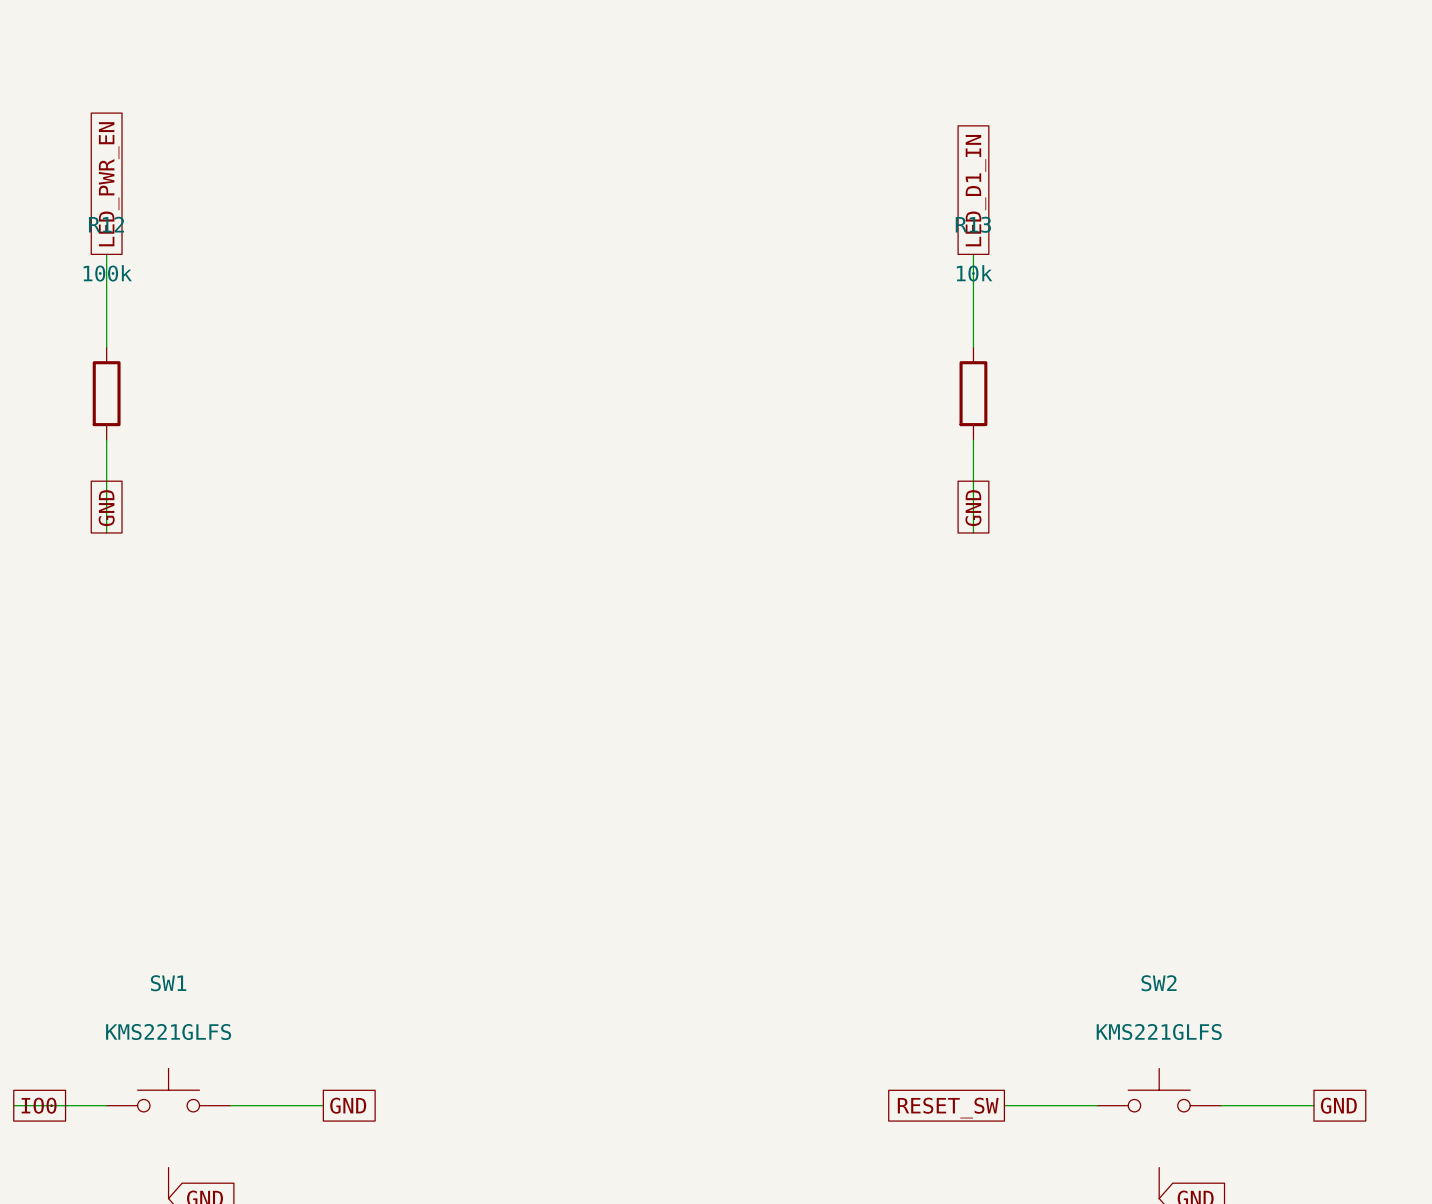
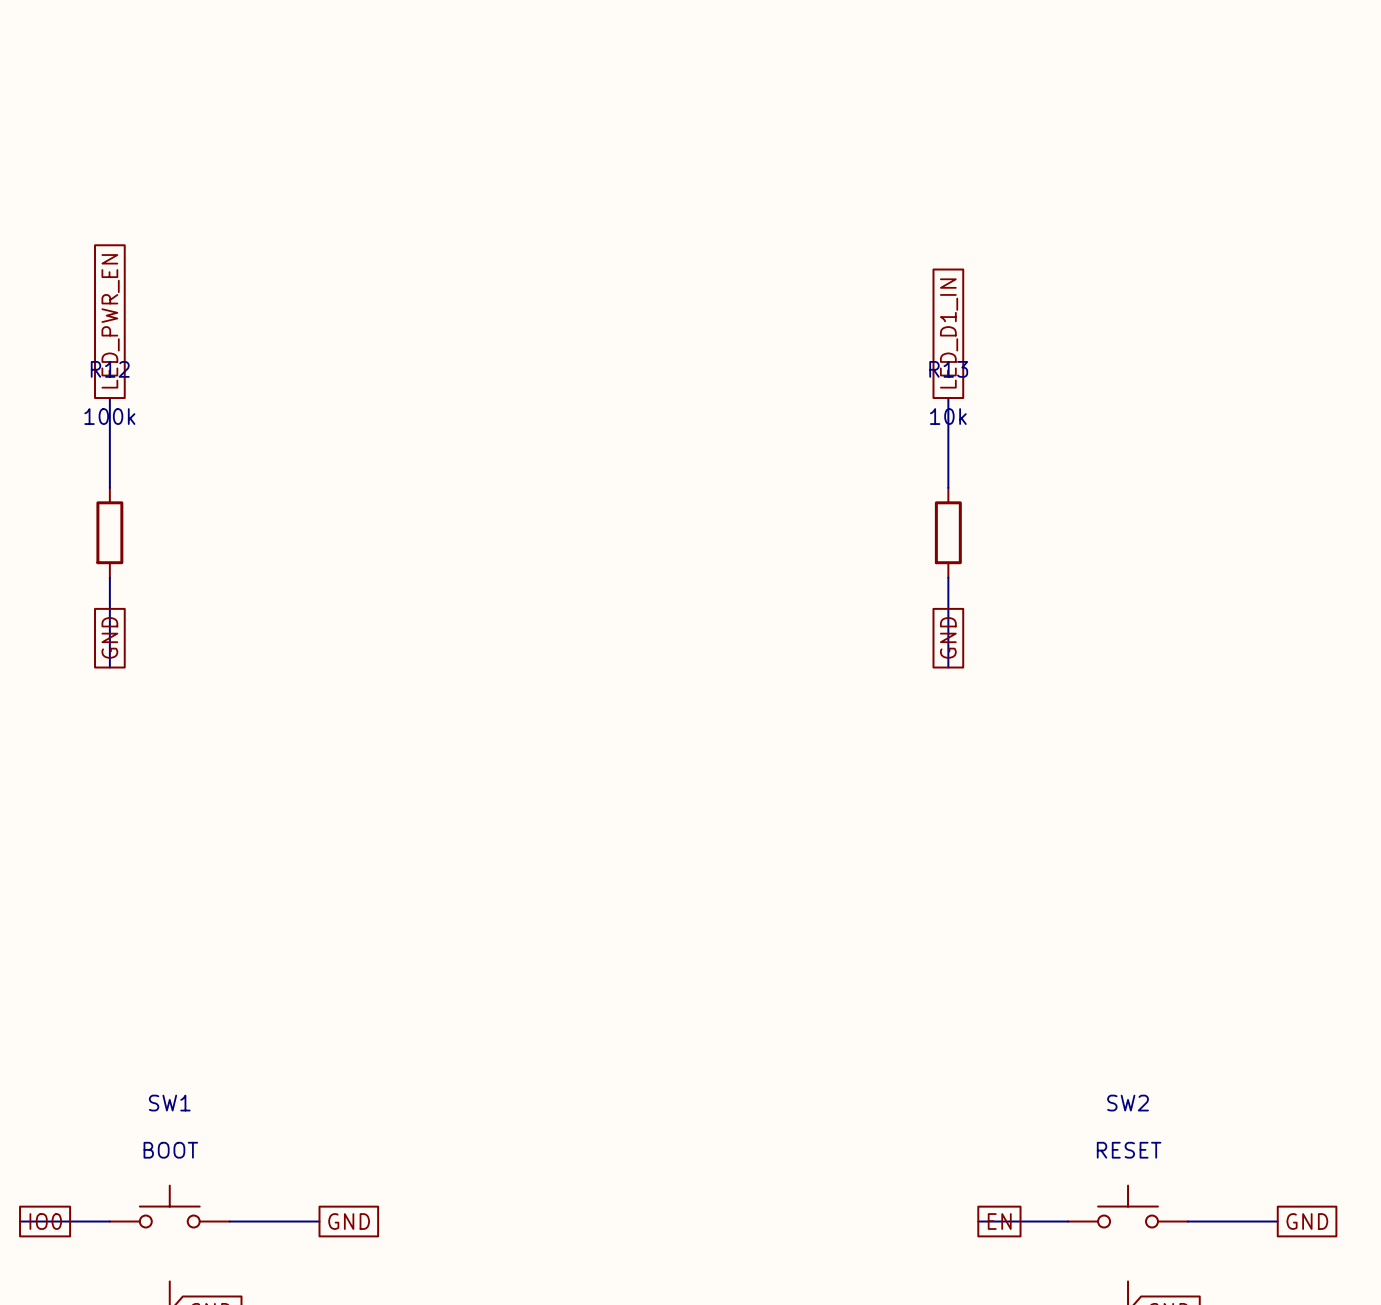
SW1 value: KMS221GLFS (168, 1031) -> BOOT (170, 1150)
SW2 value: KMS221GLFS (1159, 1031) -> RESET (1129, 1150)
global label: RESET_SW (948, 1108) -> EN (999, 1221)

